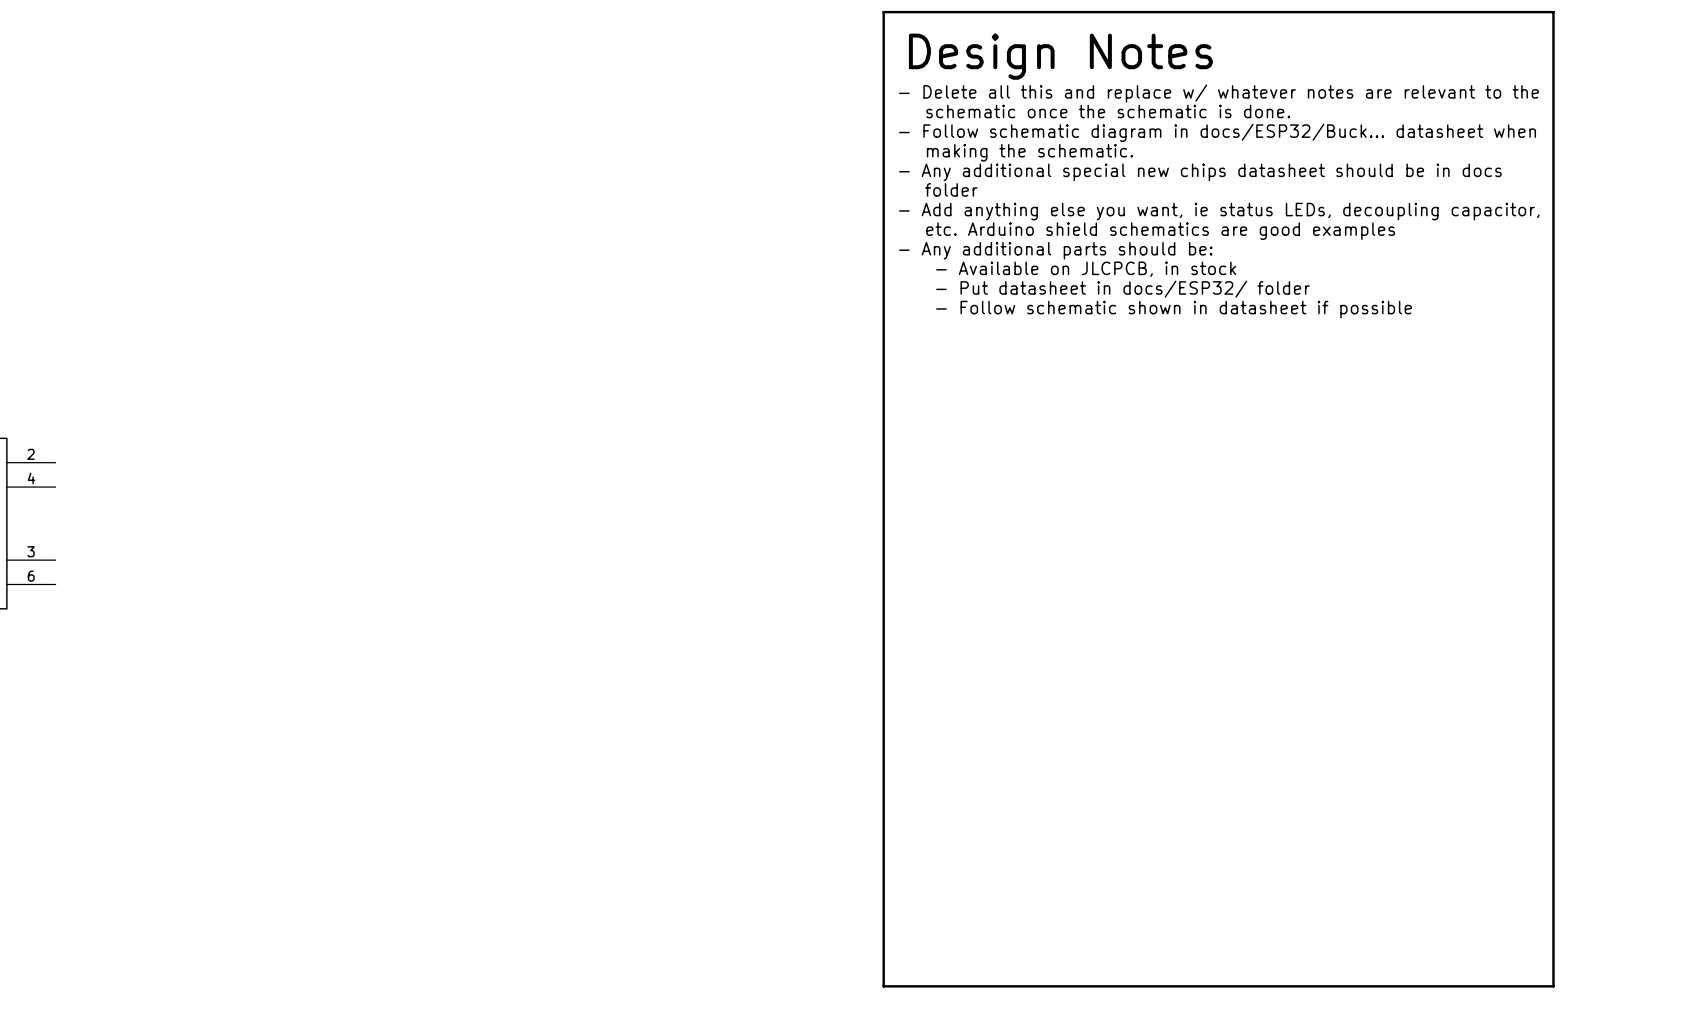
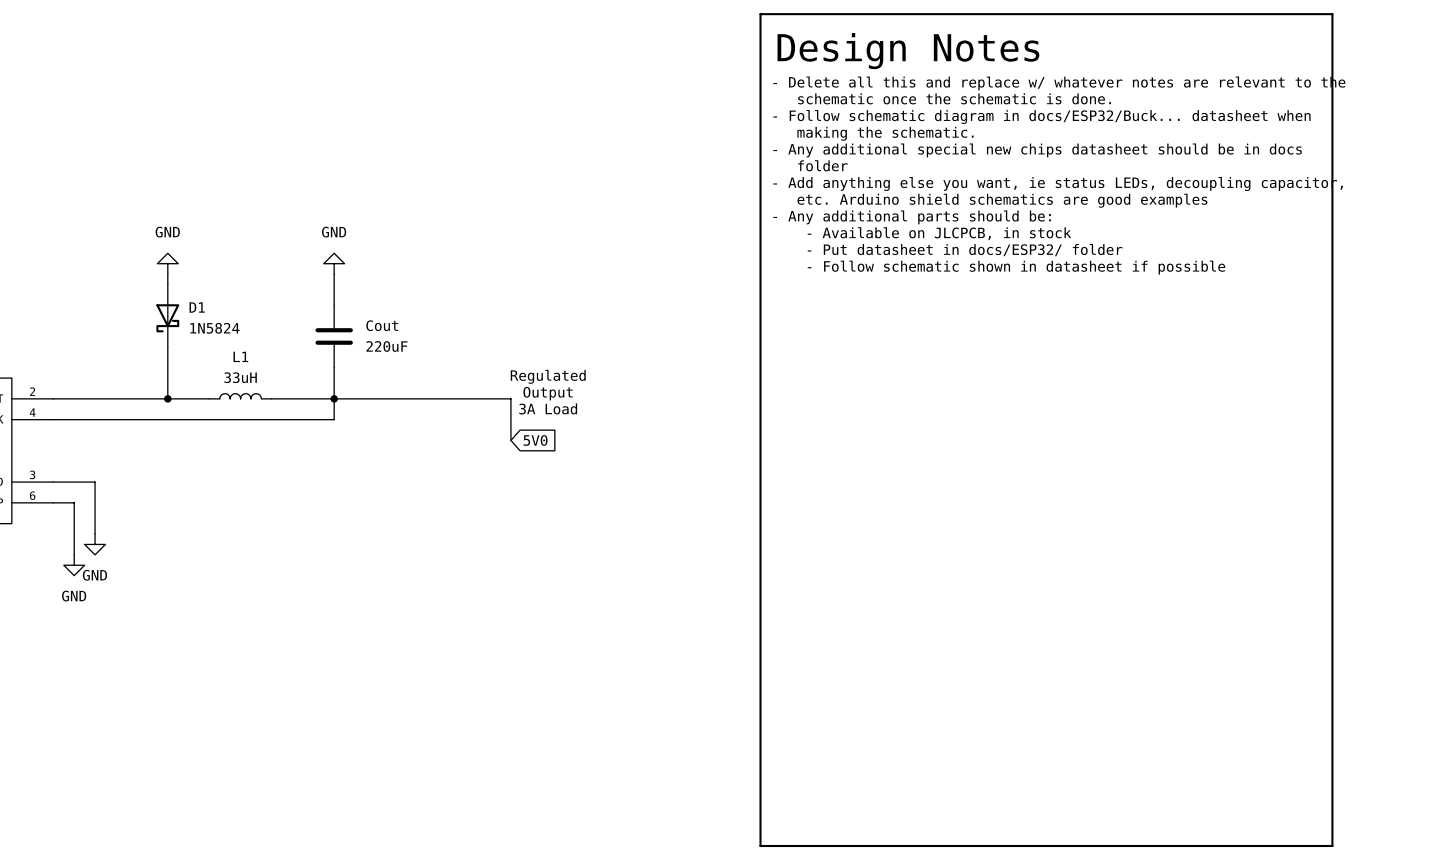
power symbol: none -> GND (167, 263)
power symbol: none -> GND (334, 263)
wire: none -> (167, 274) (167, 284)
wire: none -> (334, 274) (334, 305)
D1: none -> 1N5824 (167, 315)
Cout: none -> 220uF (334, 336)
wire: none -> (167, 346) (167, 398)
wire: none -> (334, 367) (334, 419) (53, 419)
text: none -> Regulated (548, 376)
text: none -> Output (548, 393)
L1: none -> 33uH (240, 396)
wire: none -> (53, 398) (209, 398)
junction: none -> (167, 398)
wire: none -> (271, 398) (510, 398) (510, 440)
junction: none -> (334, 398)
text: none -> 3A Load (548, 408)
global label: none -> 5V0 (535, 440)
wire: none -> (53, 482) (95, 482) (95, 534)
wire: none -> (53, 502) (74, 502) (74, 554)
power symbol: none -> GND (95, 544)
power symbol: none -> GND (74, 565)

